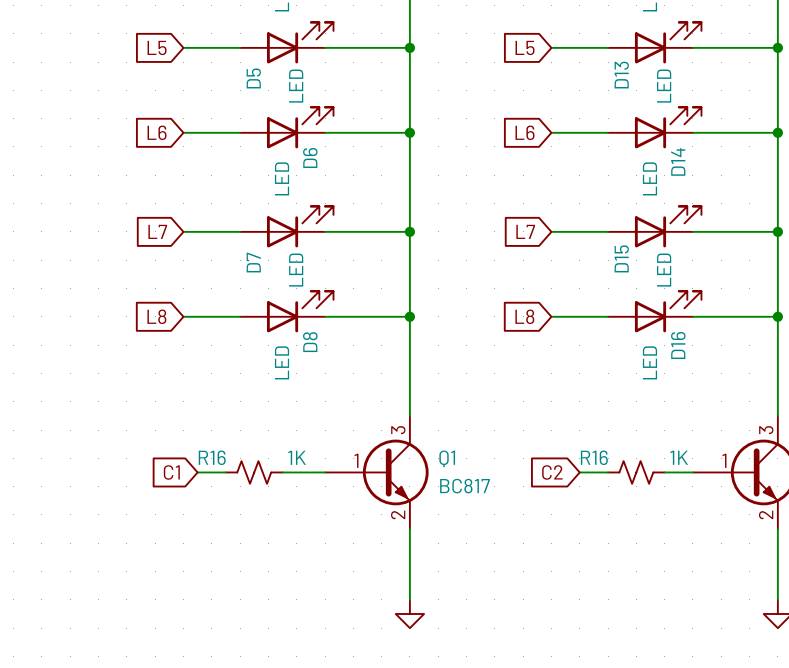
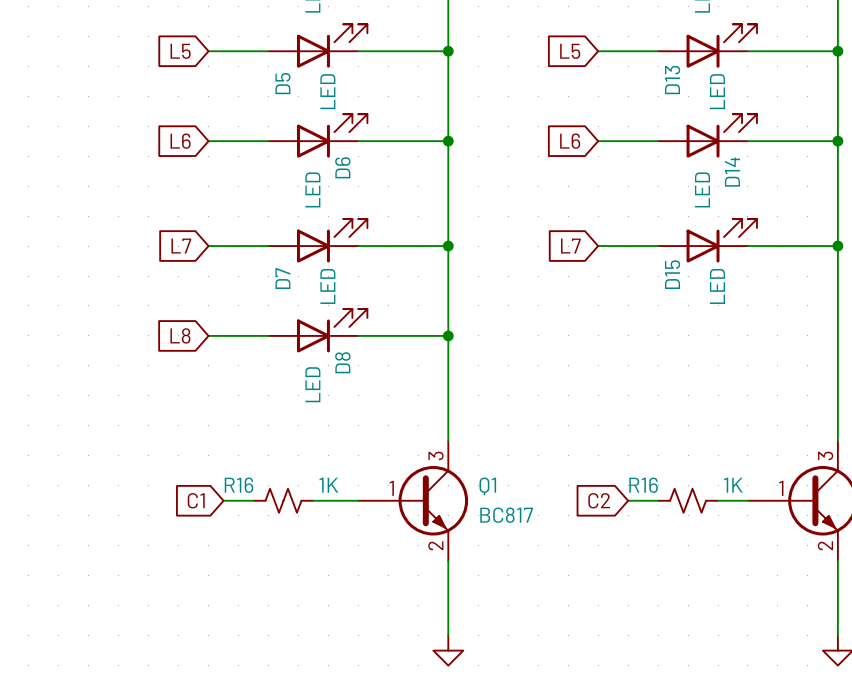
D16: LED (654, 311) -> none
global label: L8 (524, 316) -> none
wire: (551, 316) (608, 316) -> none
wire: (692, 316) (777, 316) -> none
junction: (777, 316) -> none

